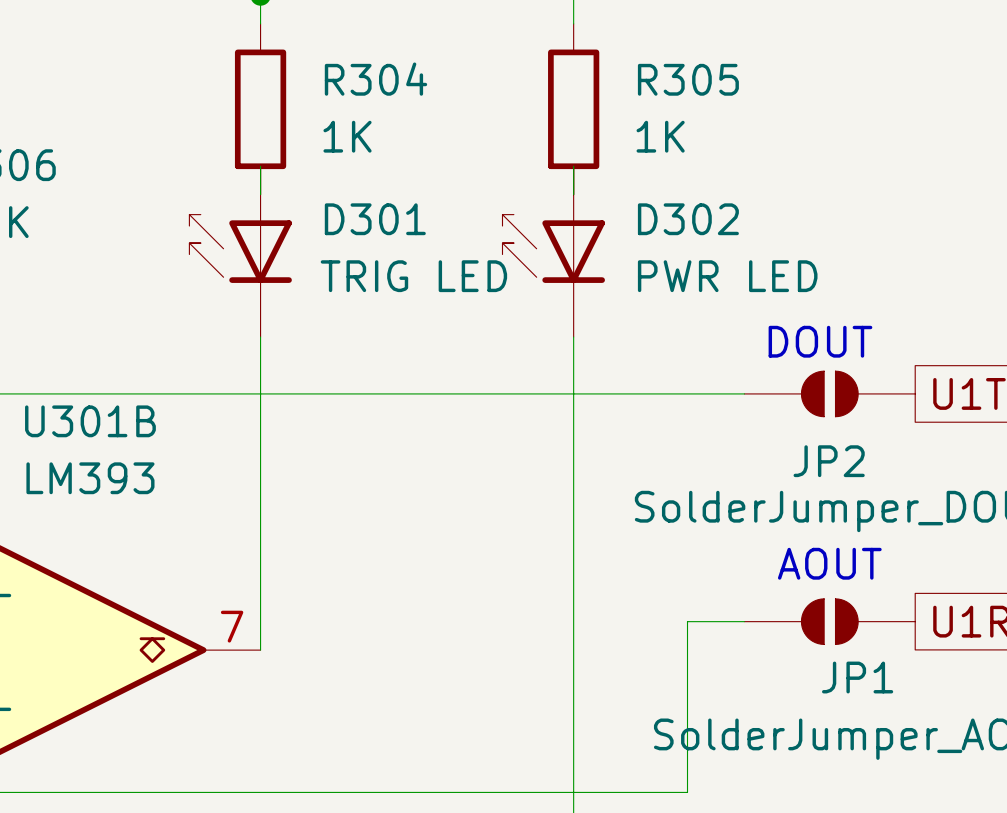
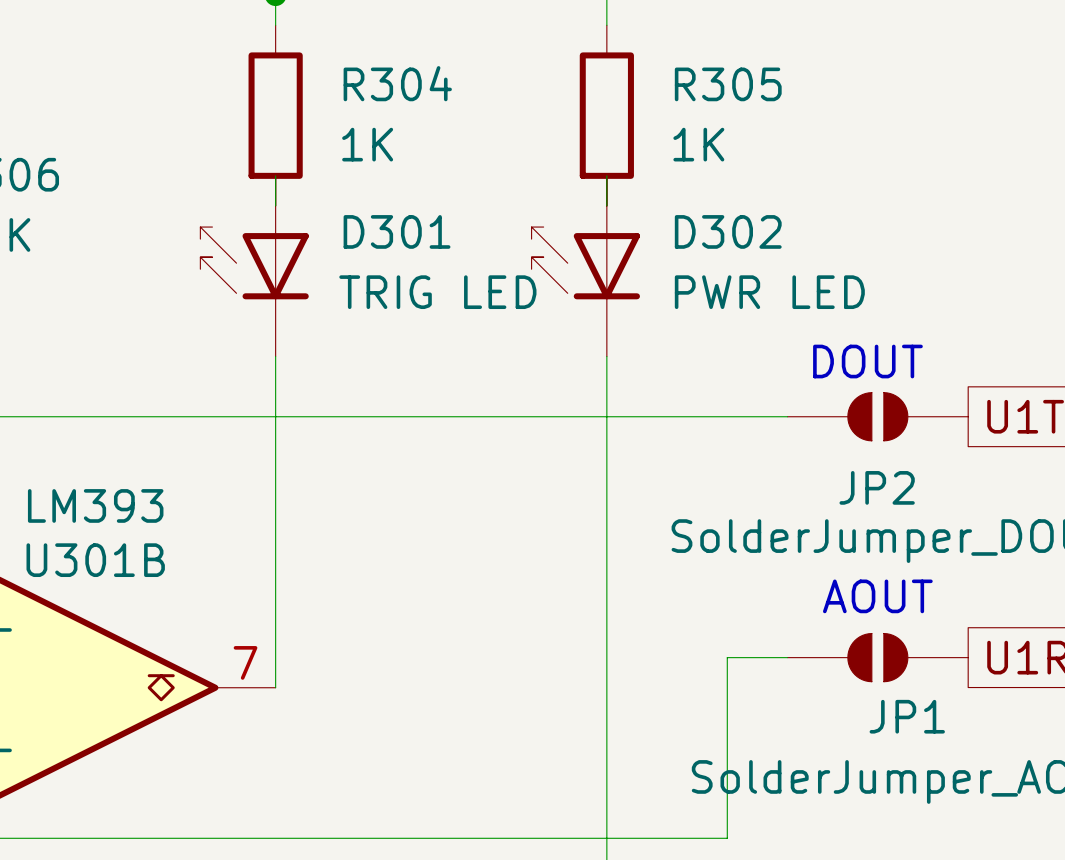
U301B name position: U301B (90, 421) -> U301B (95, 560)

